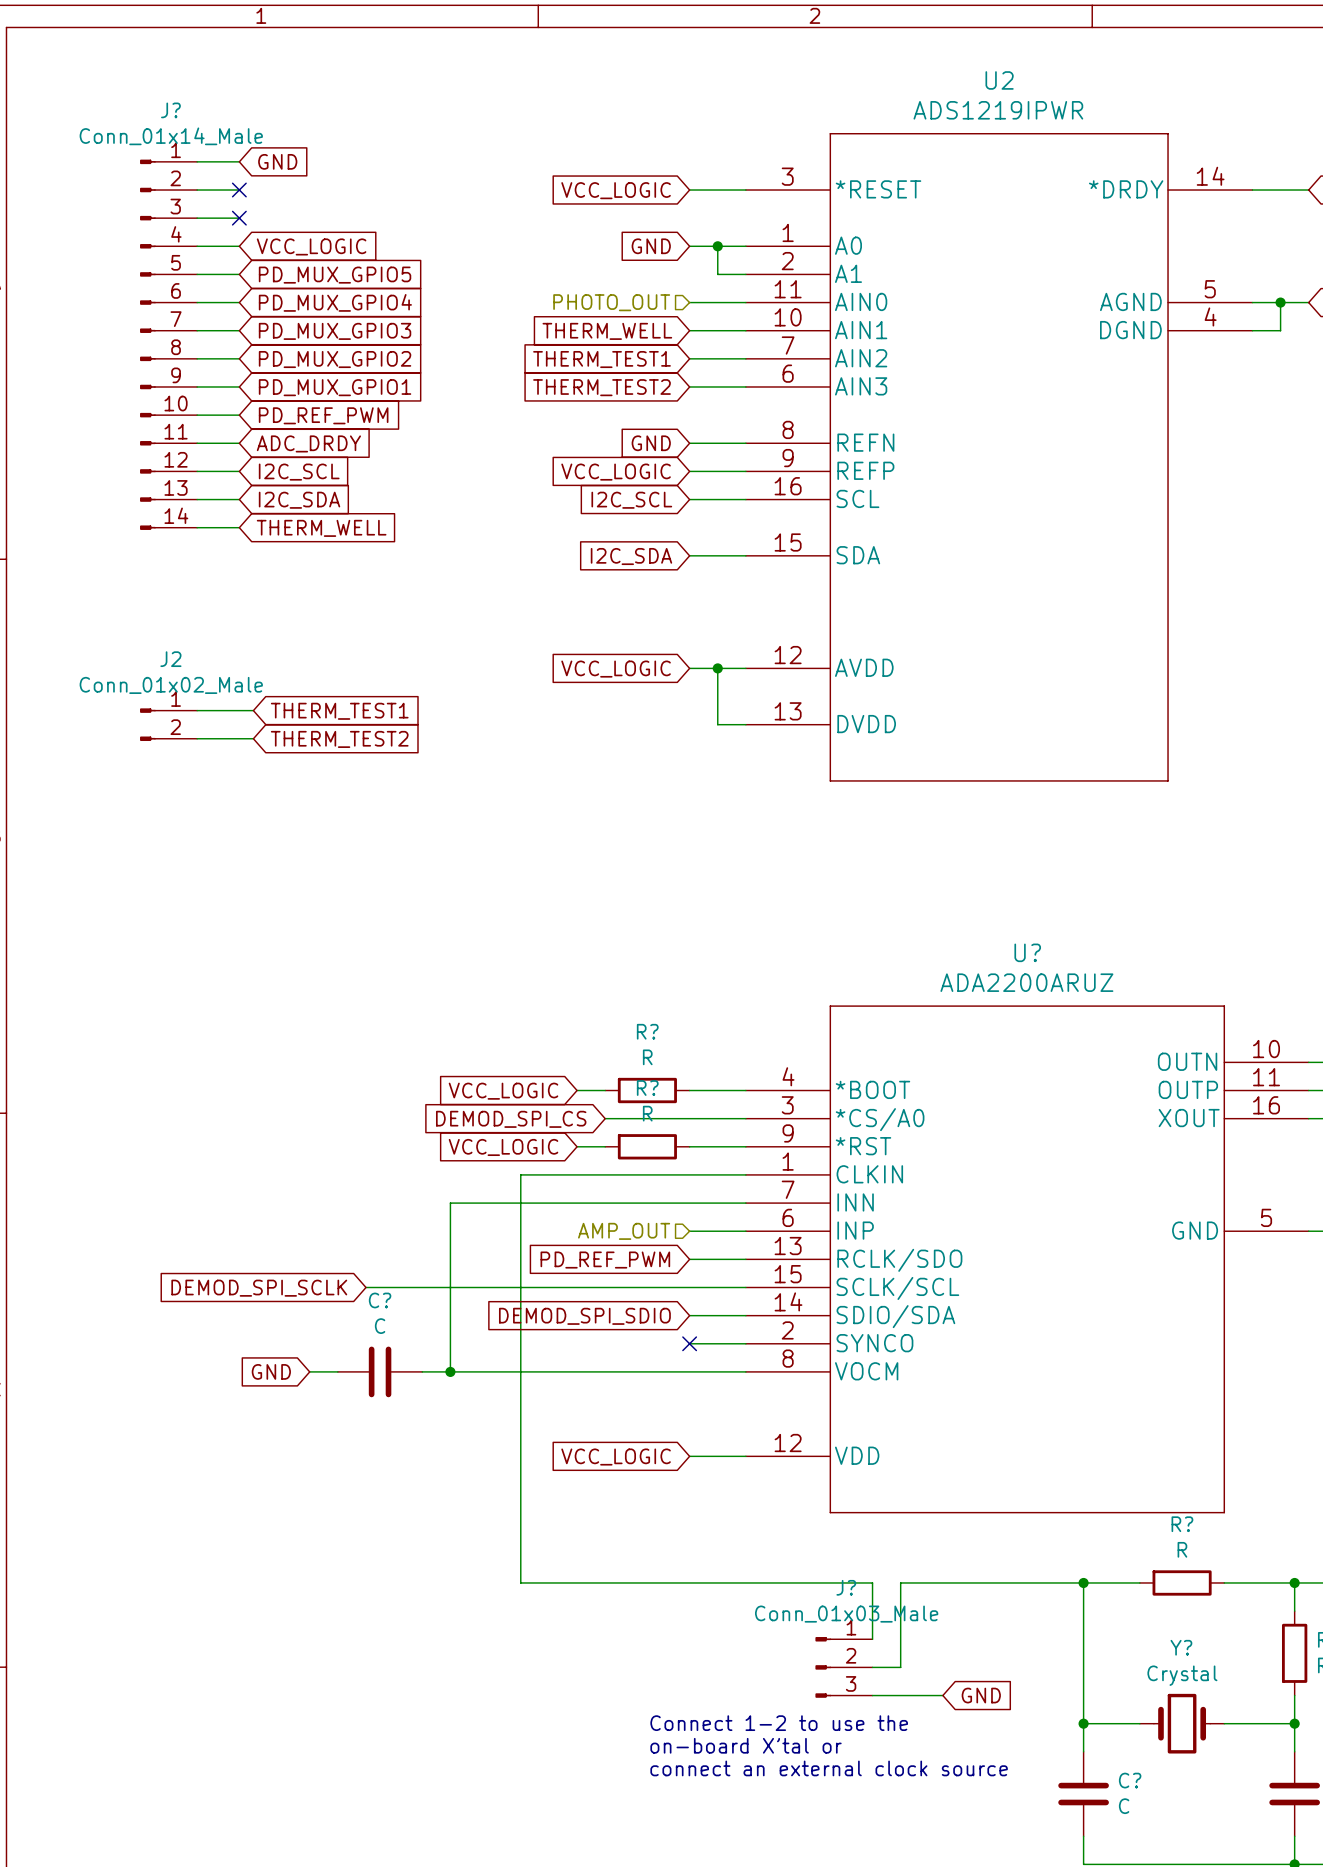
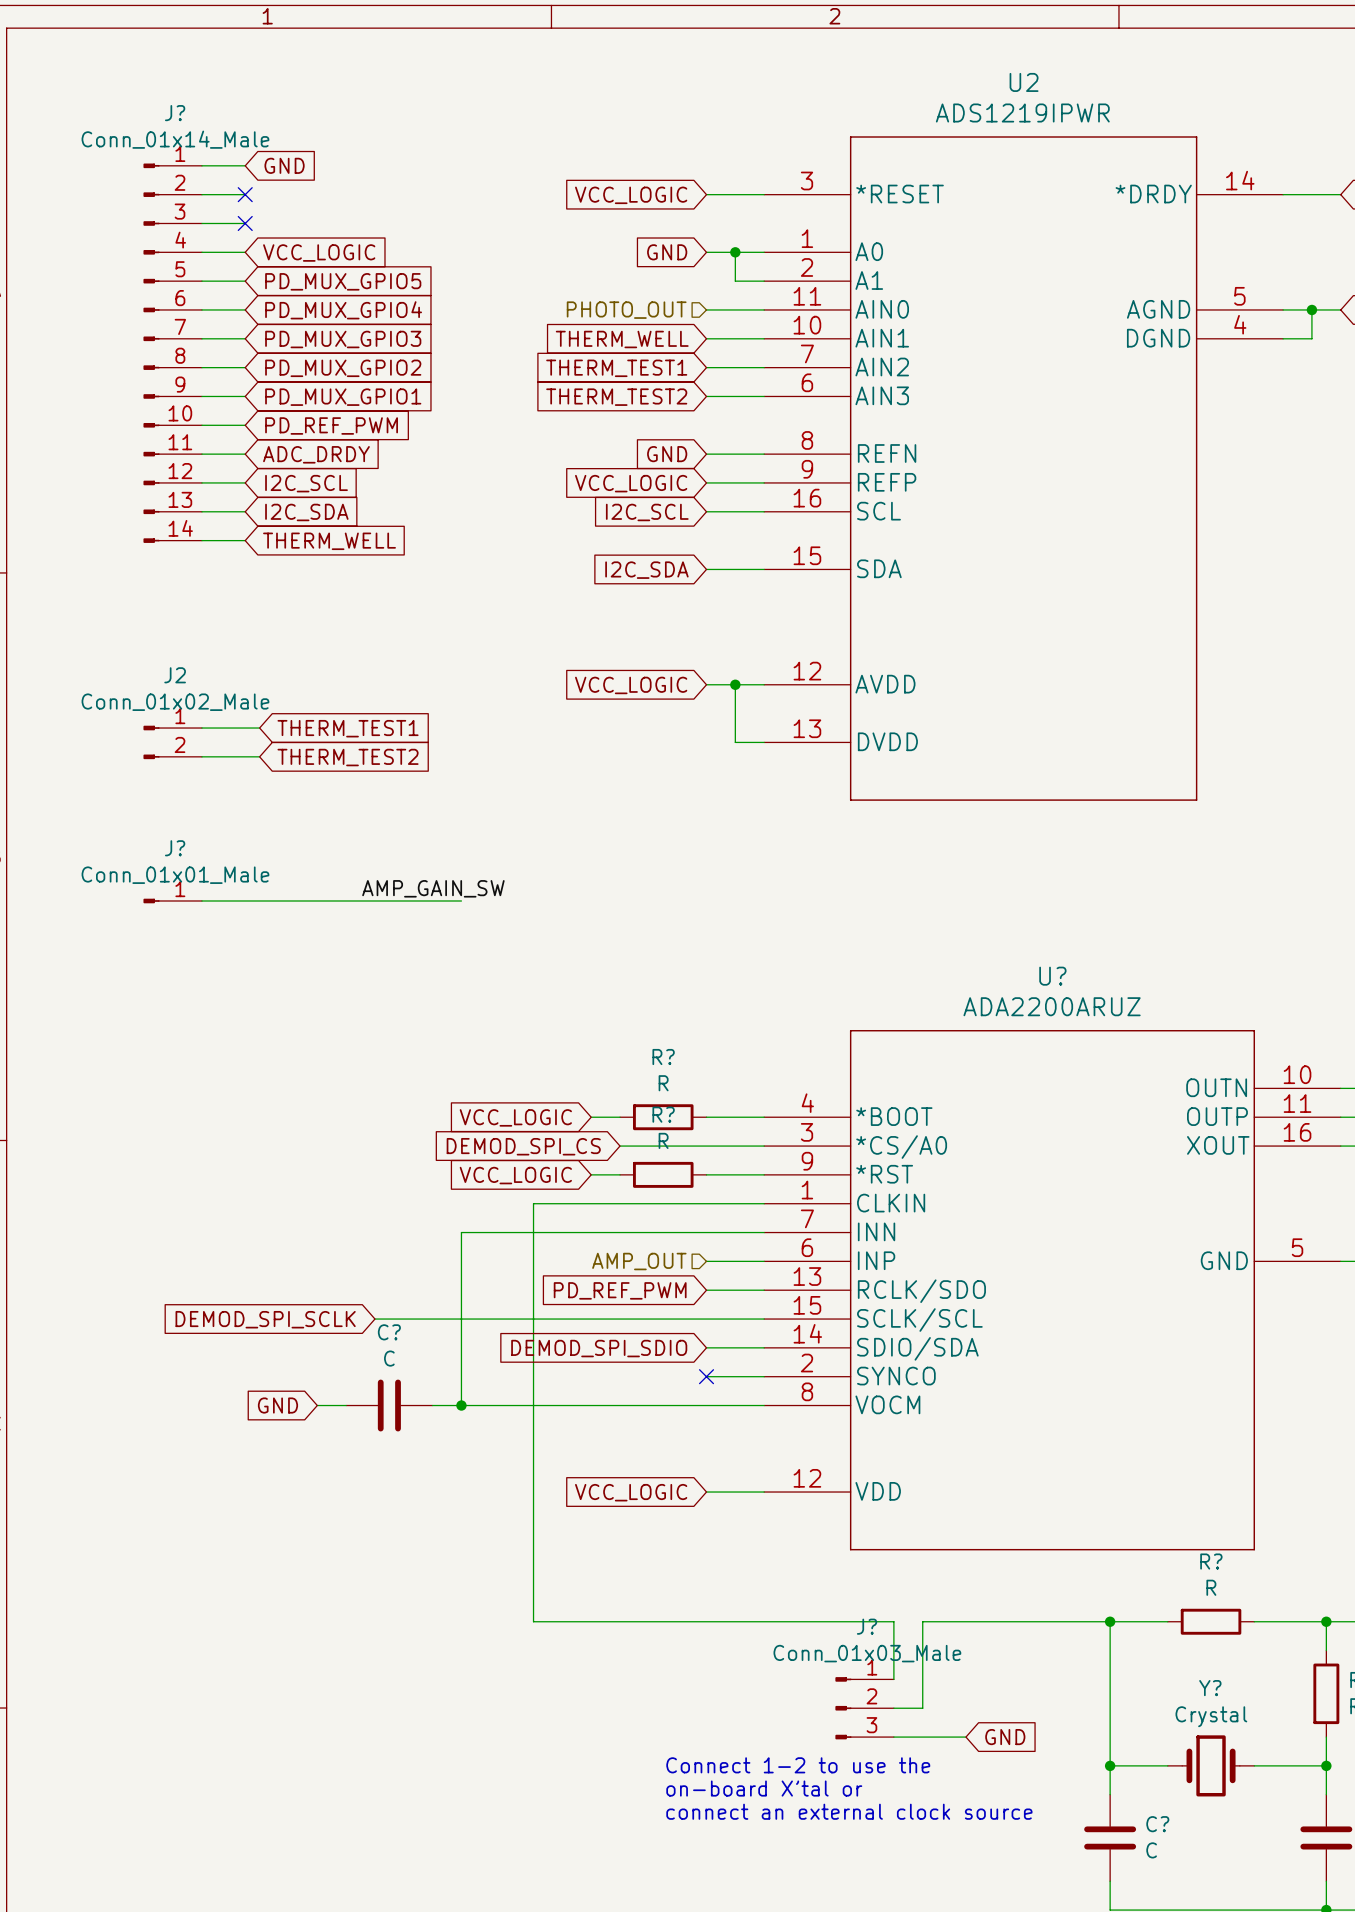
label: none -> AMP_GAIN_SW (433, 888)
J?: none -> Conn_01x01_Male (172, 900)
wire: none -> (201, 900) (461, 900)

